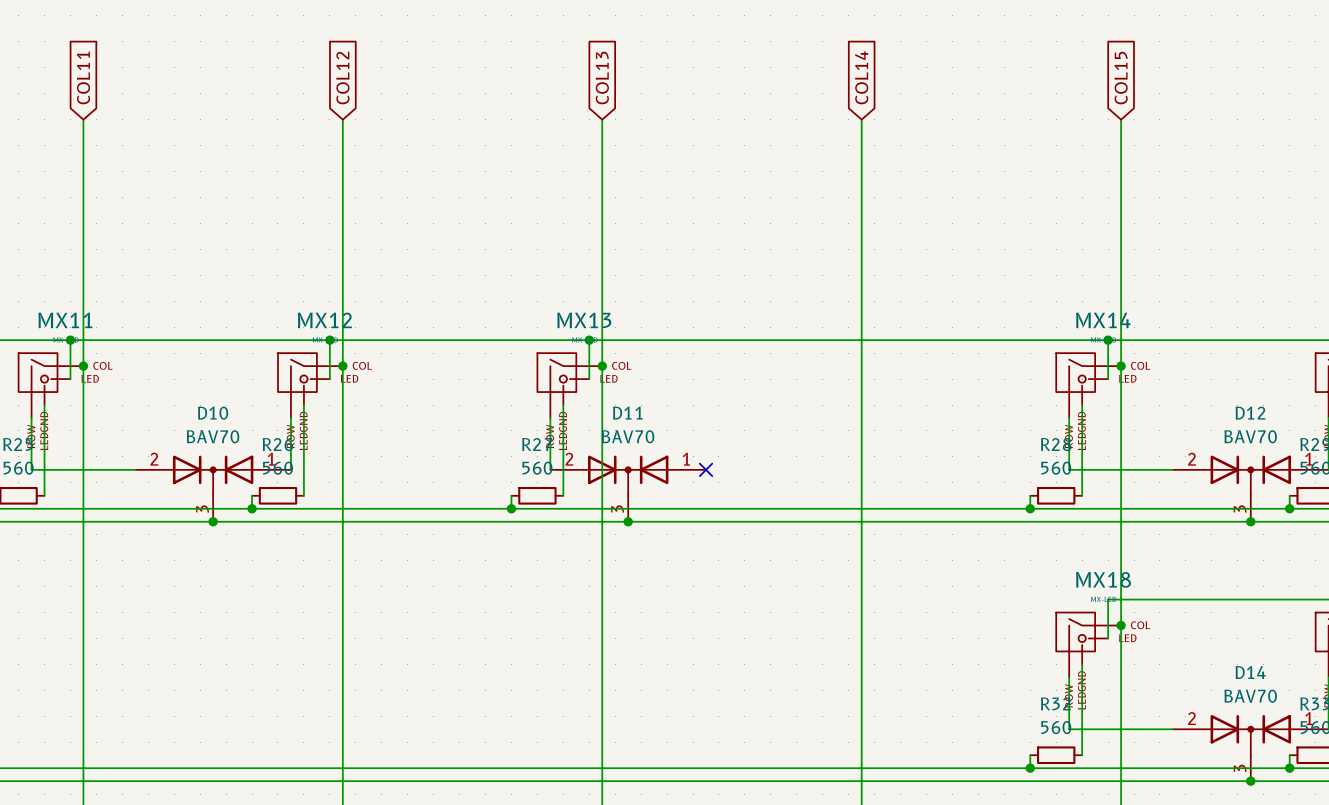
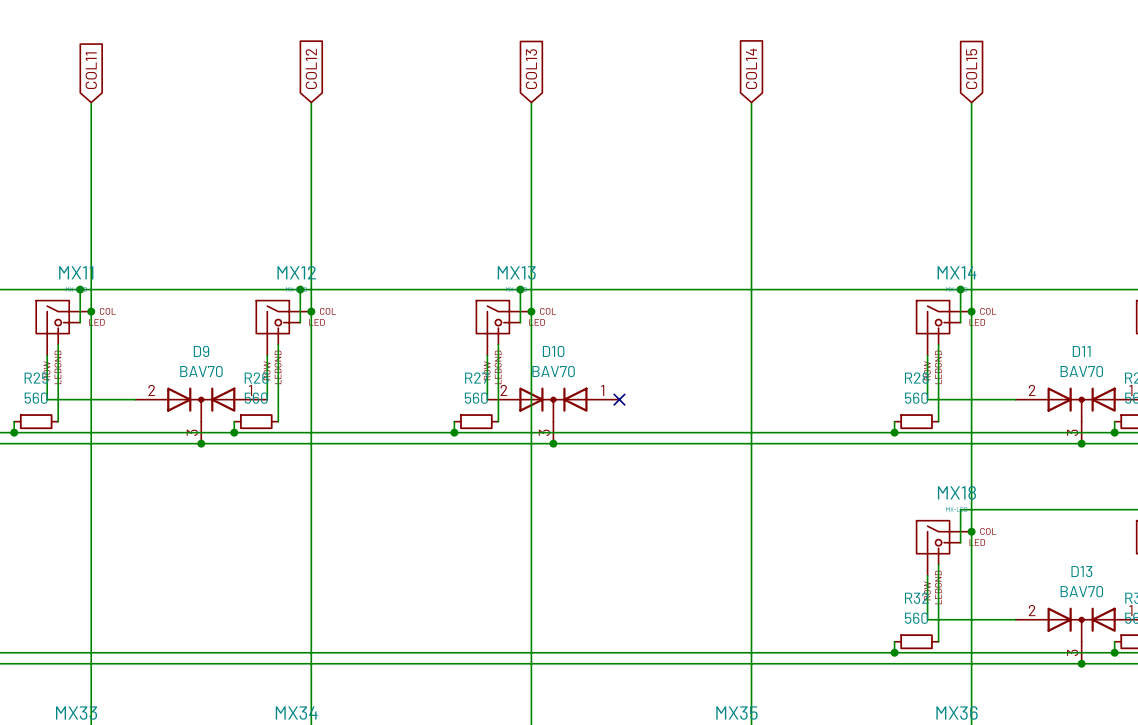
D10 name: D10 (213, 413) -> D9 (201, 351)
D11 name: D11 (627, 413) -> D10 (553, 351)
D12 name: D12 (1250, 413) -> D11 (1081, 351)
D14 name: D14 (1250, 672) -> D13 (1081, 571)

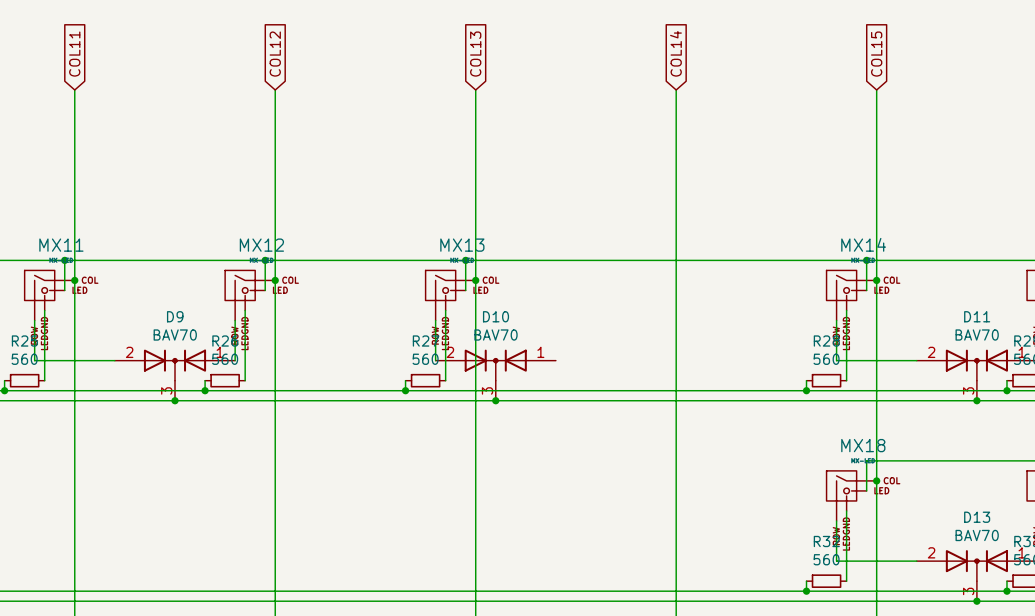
no-connect mark: (619, 399) -> none

